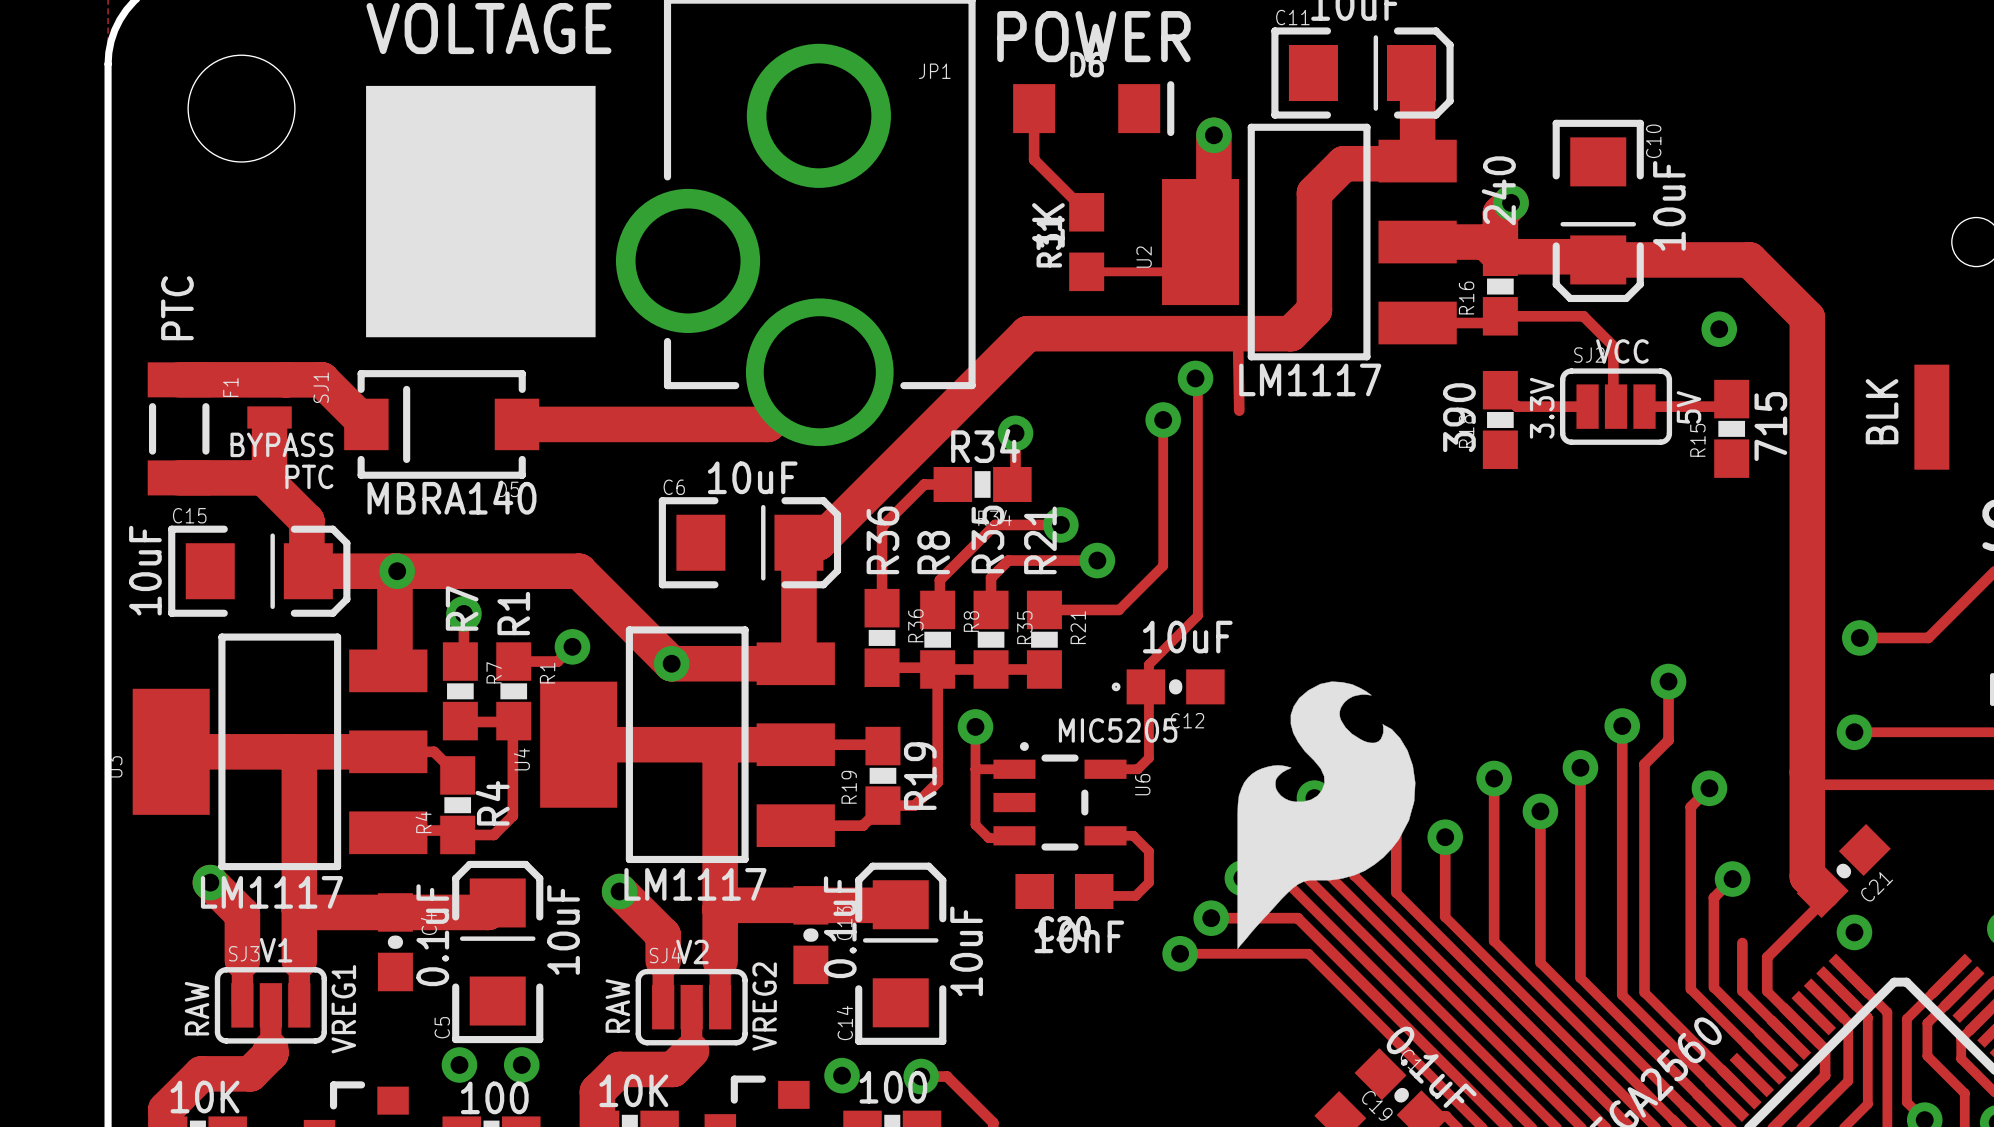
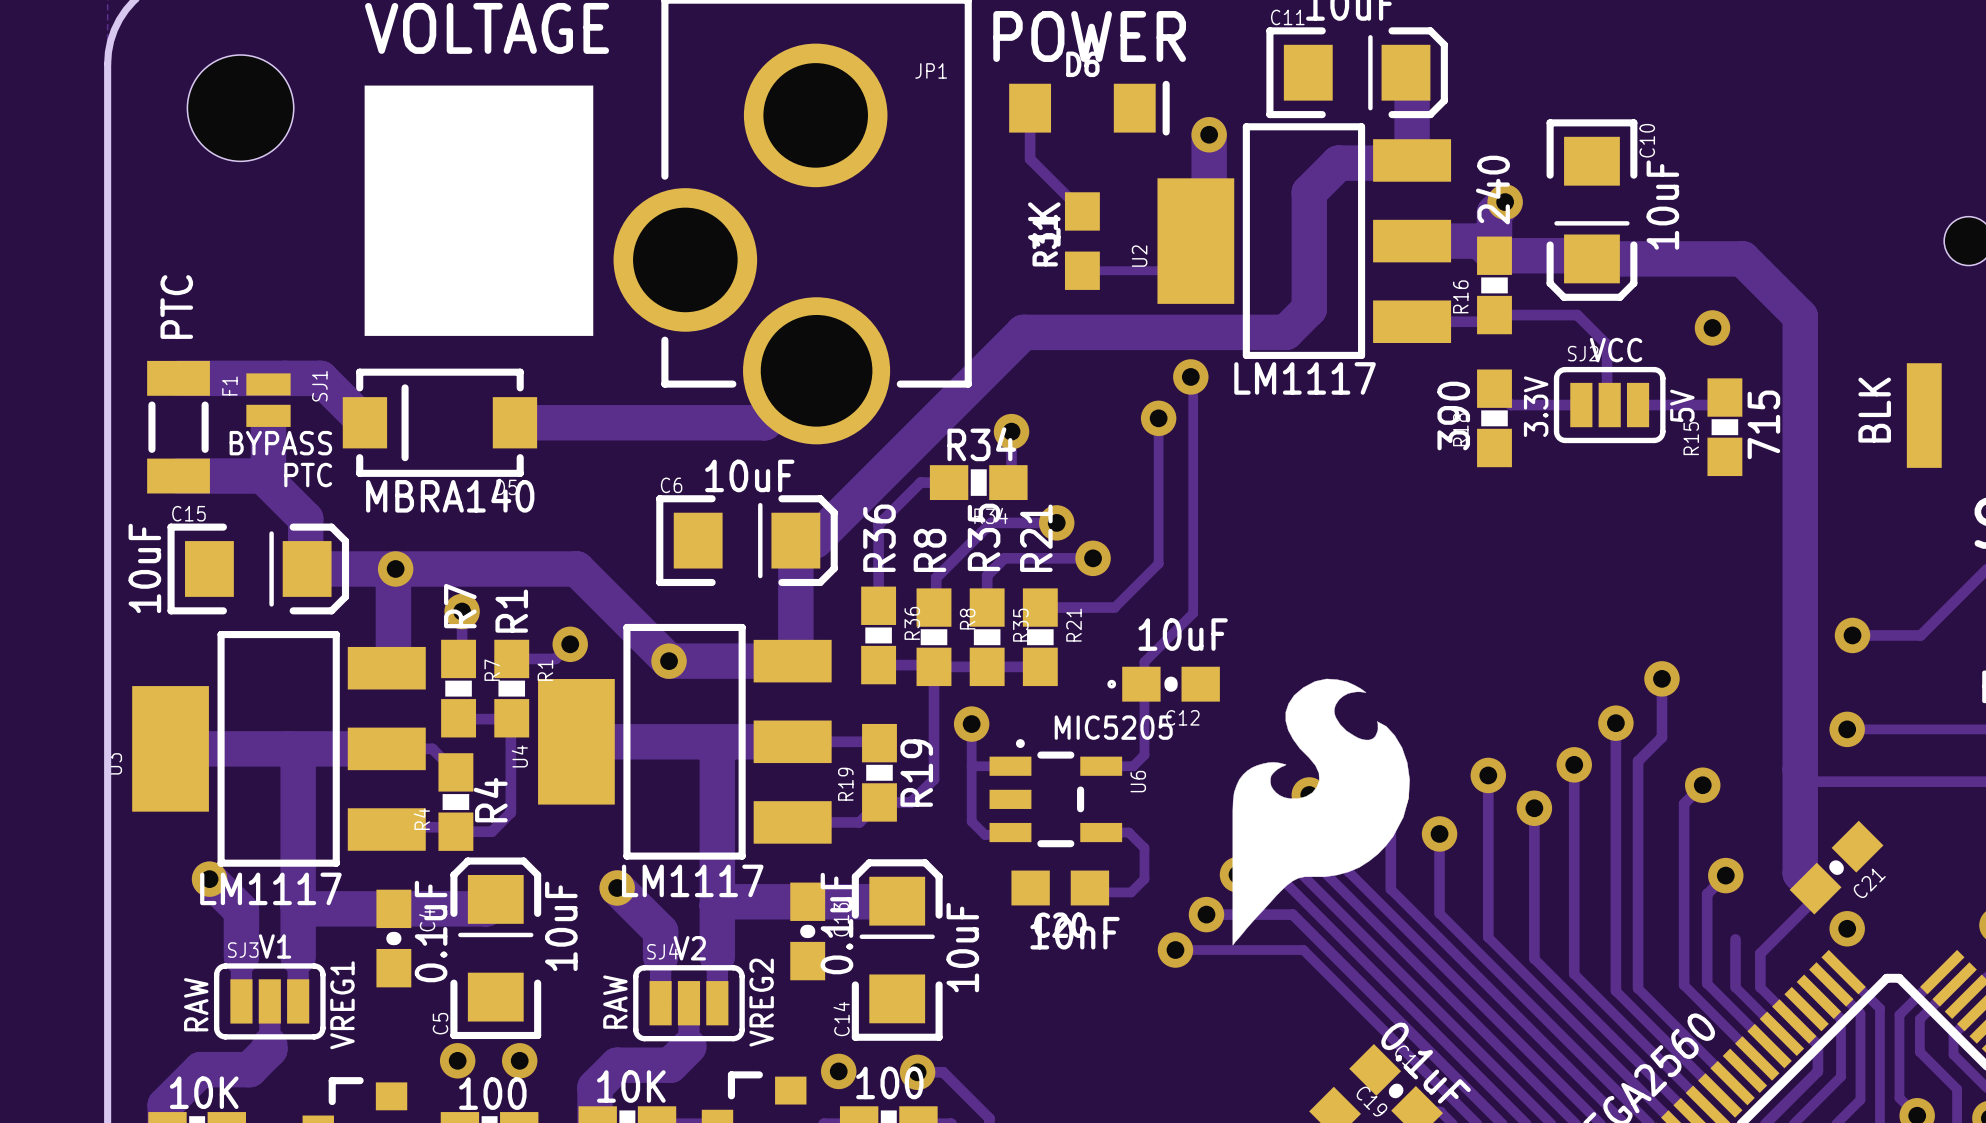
track: (1237, 333) (1239, 410) -> none

